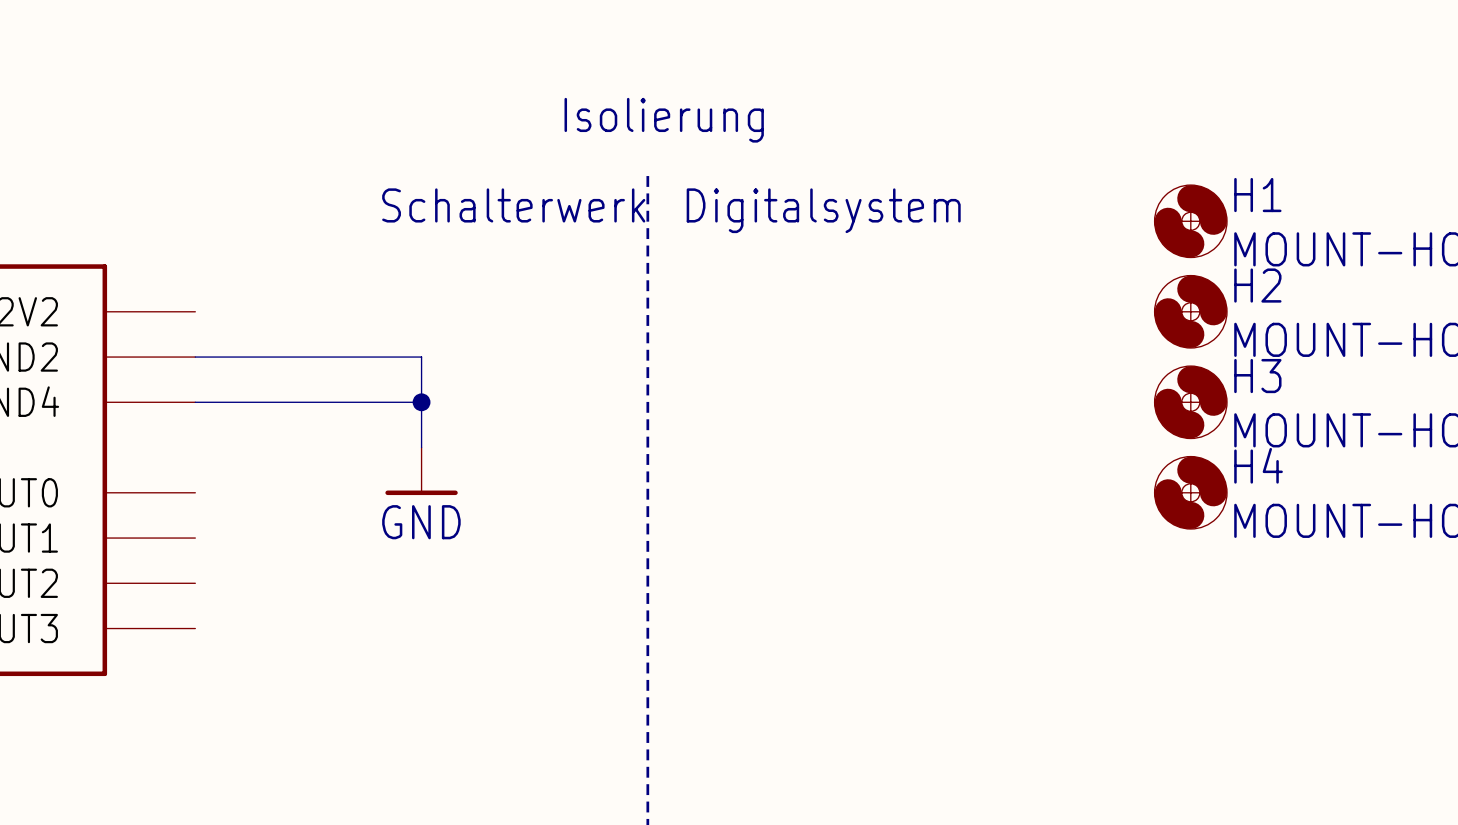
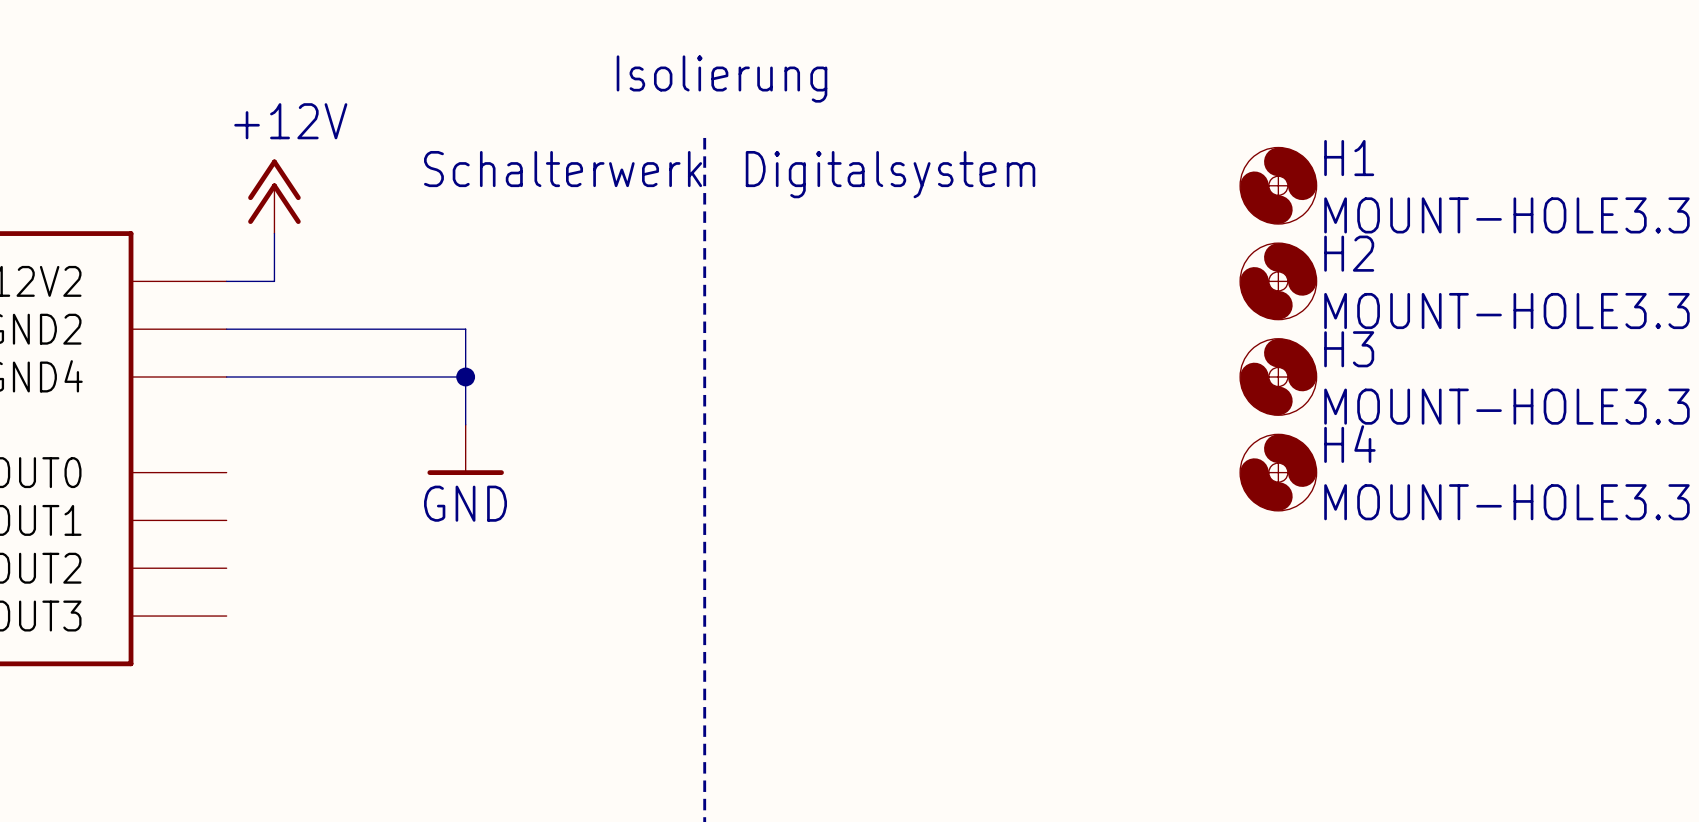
power symbol: none -> +12V (274, 196)
wire: none -> (274, 233) (274, 281) (226, 281)

